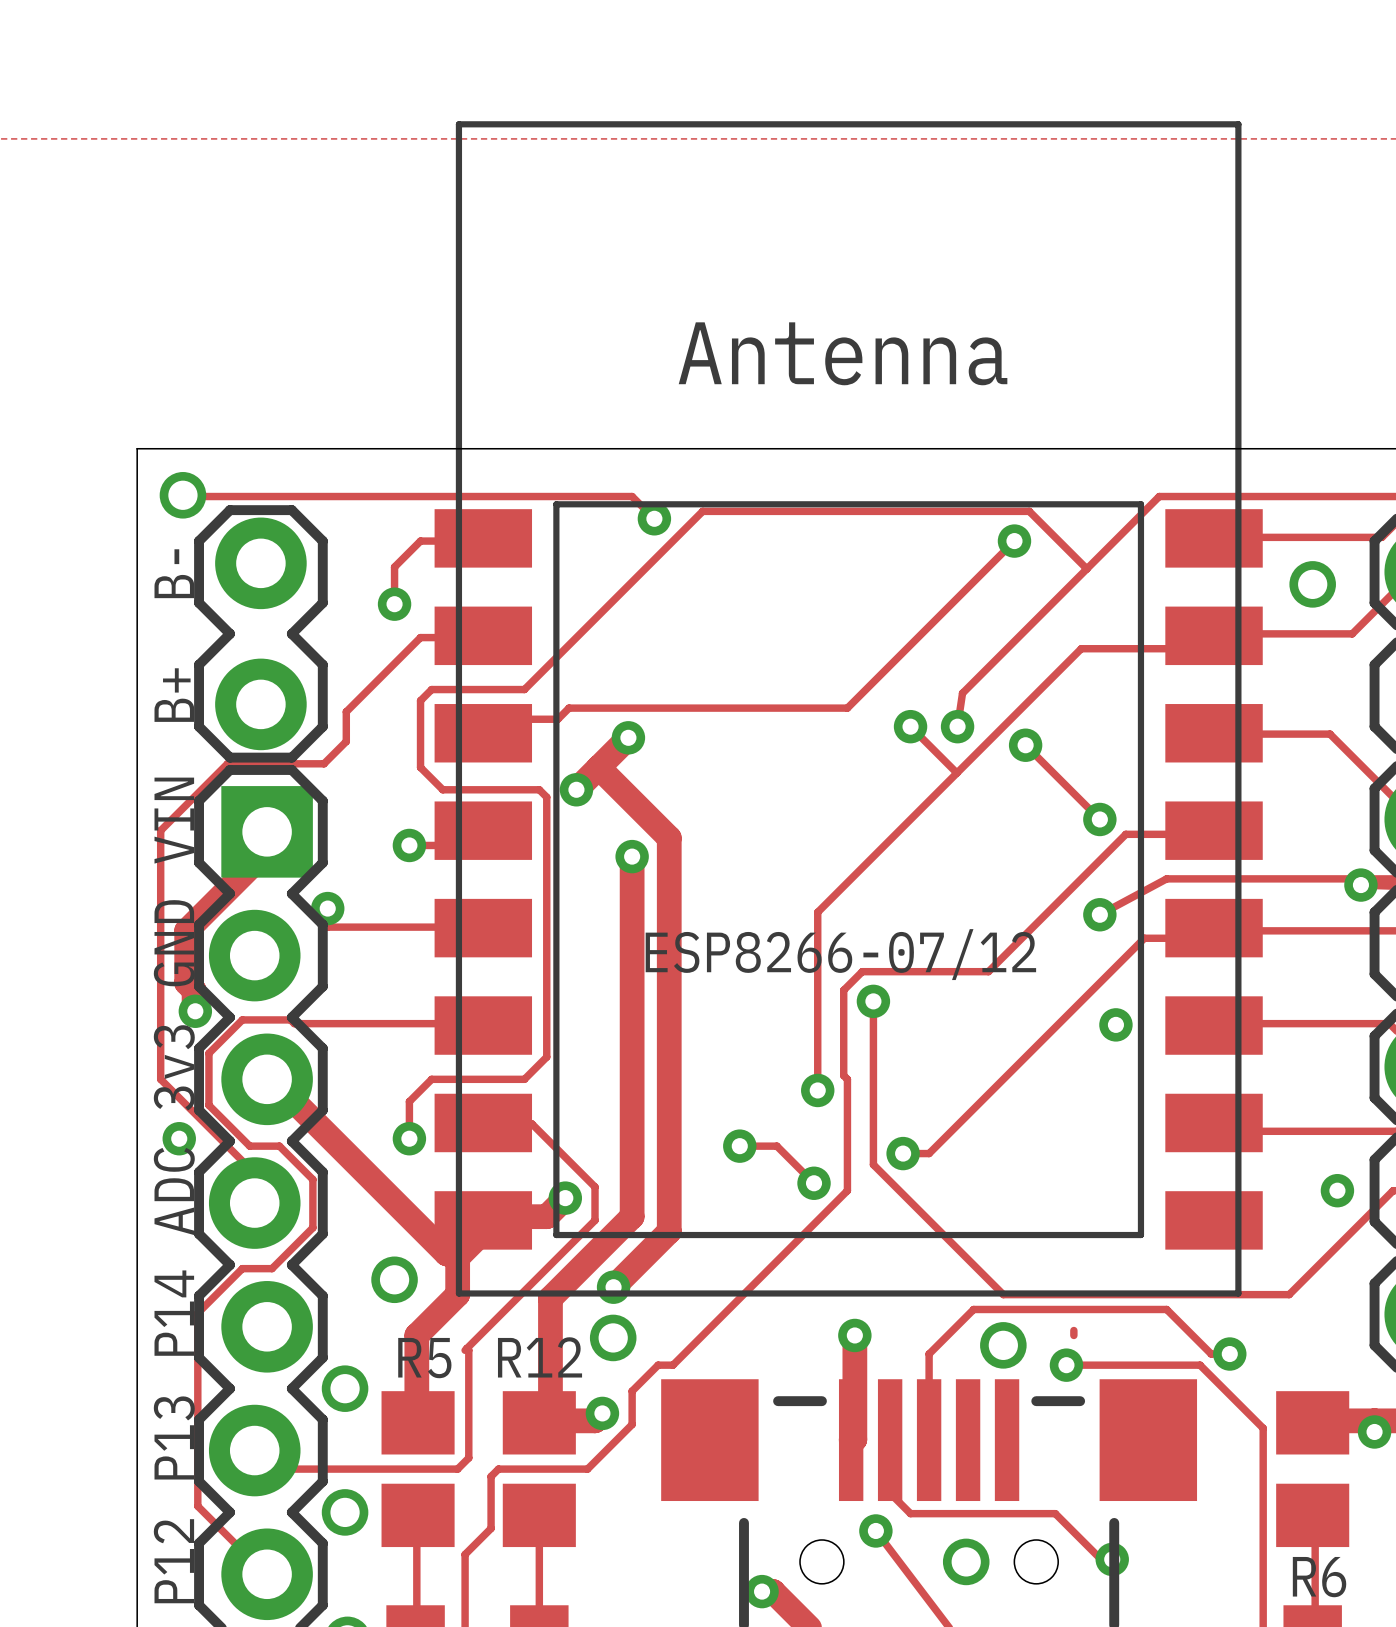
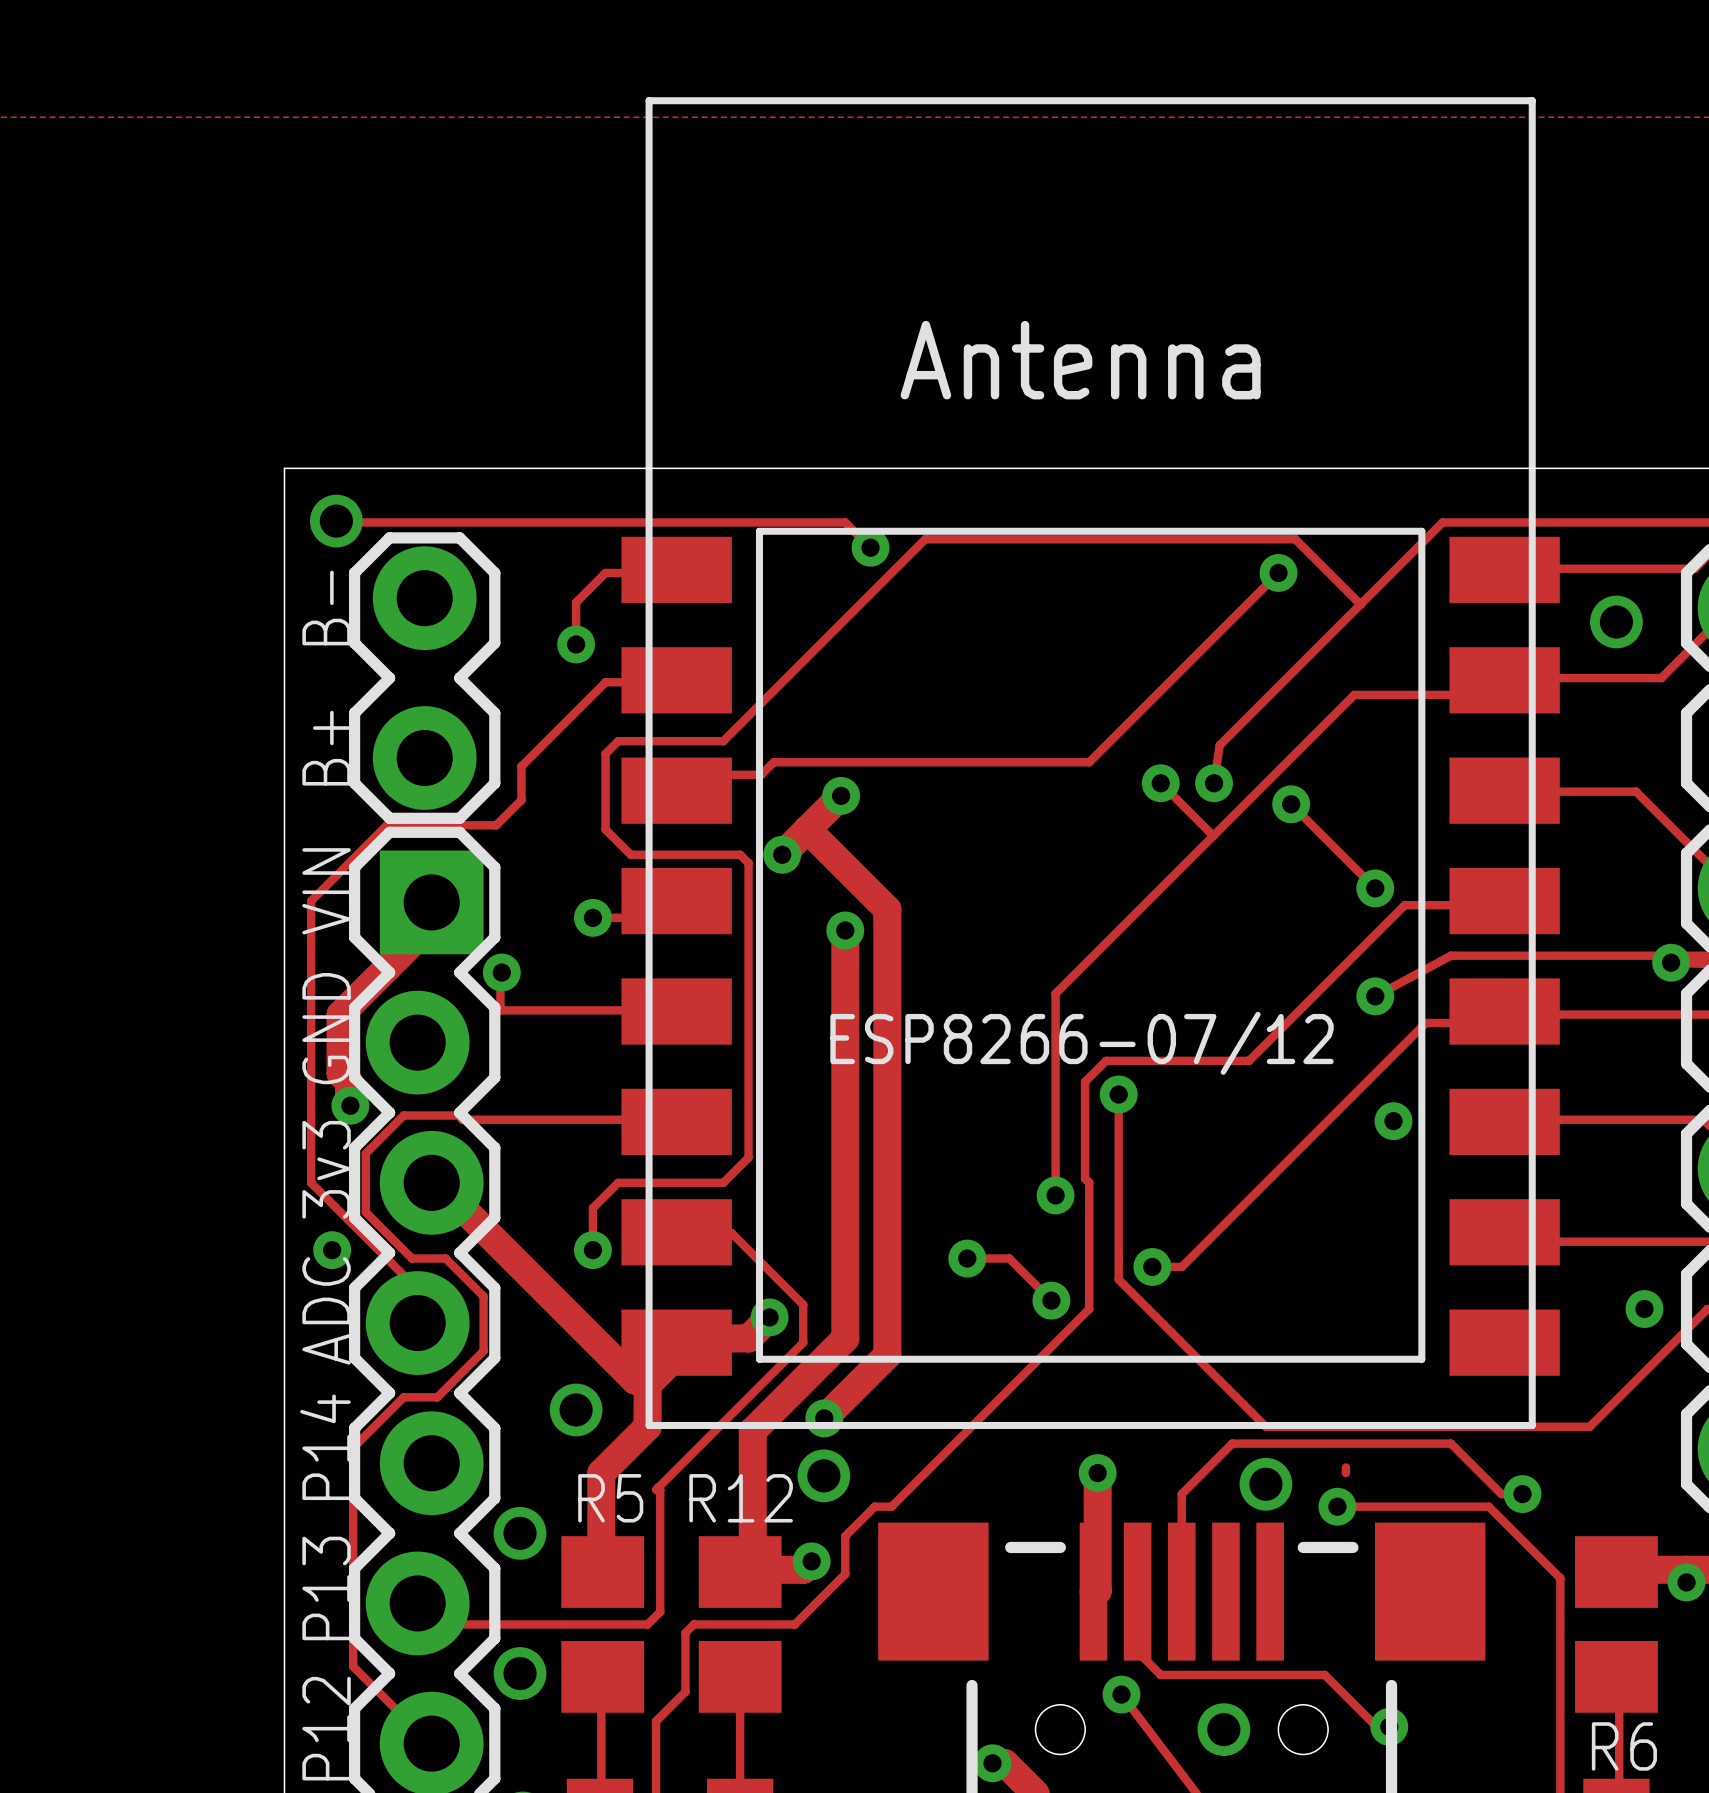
via position: (327, 908) -> (501, 972)

